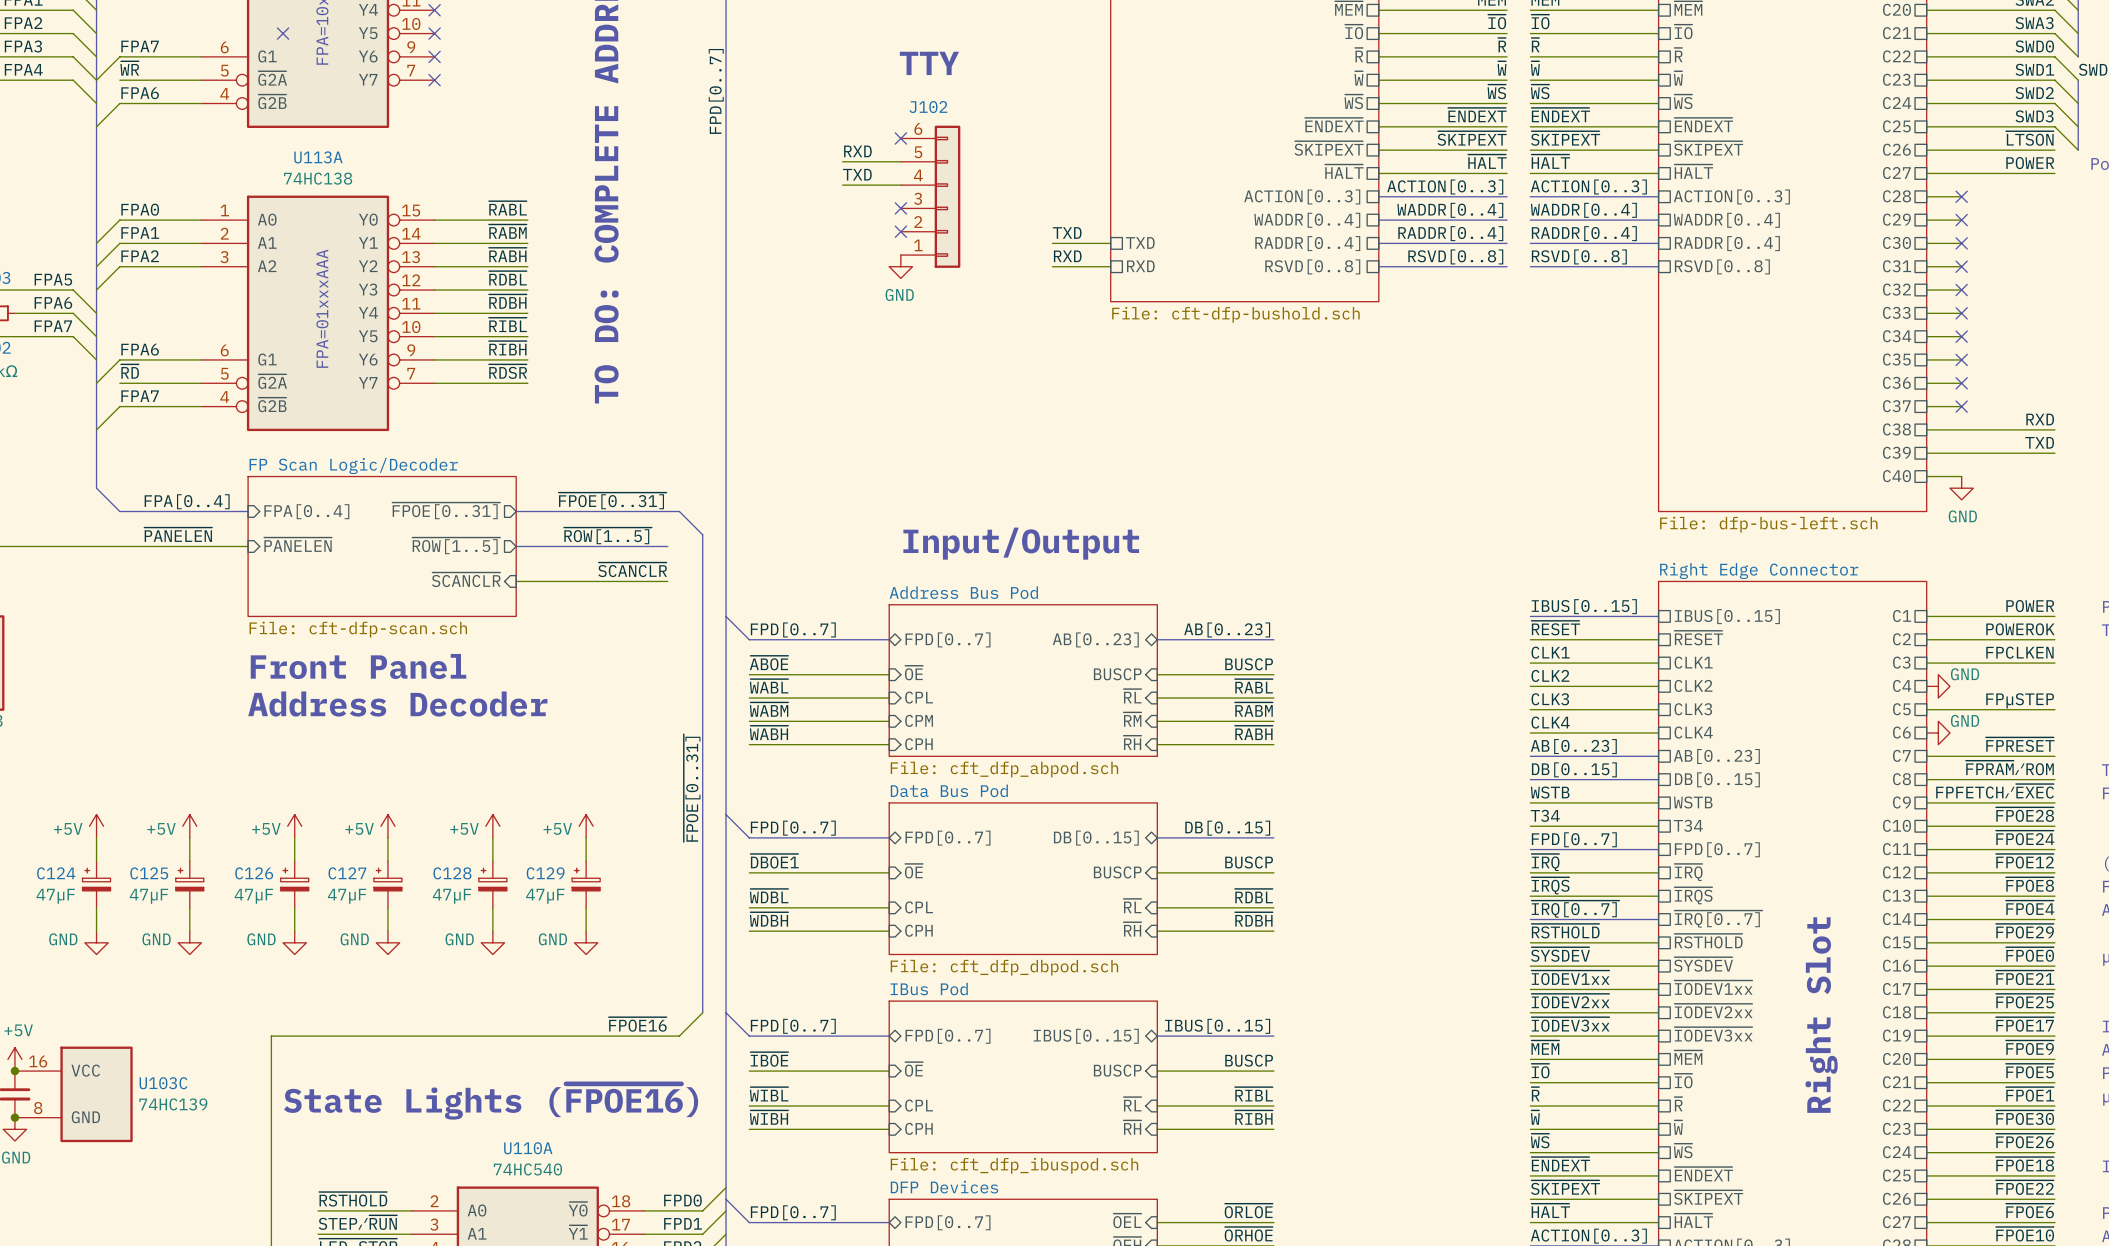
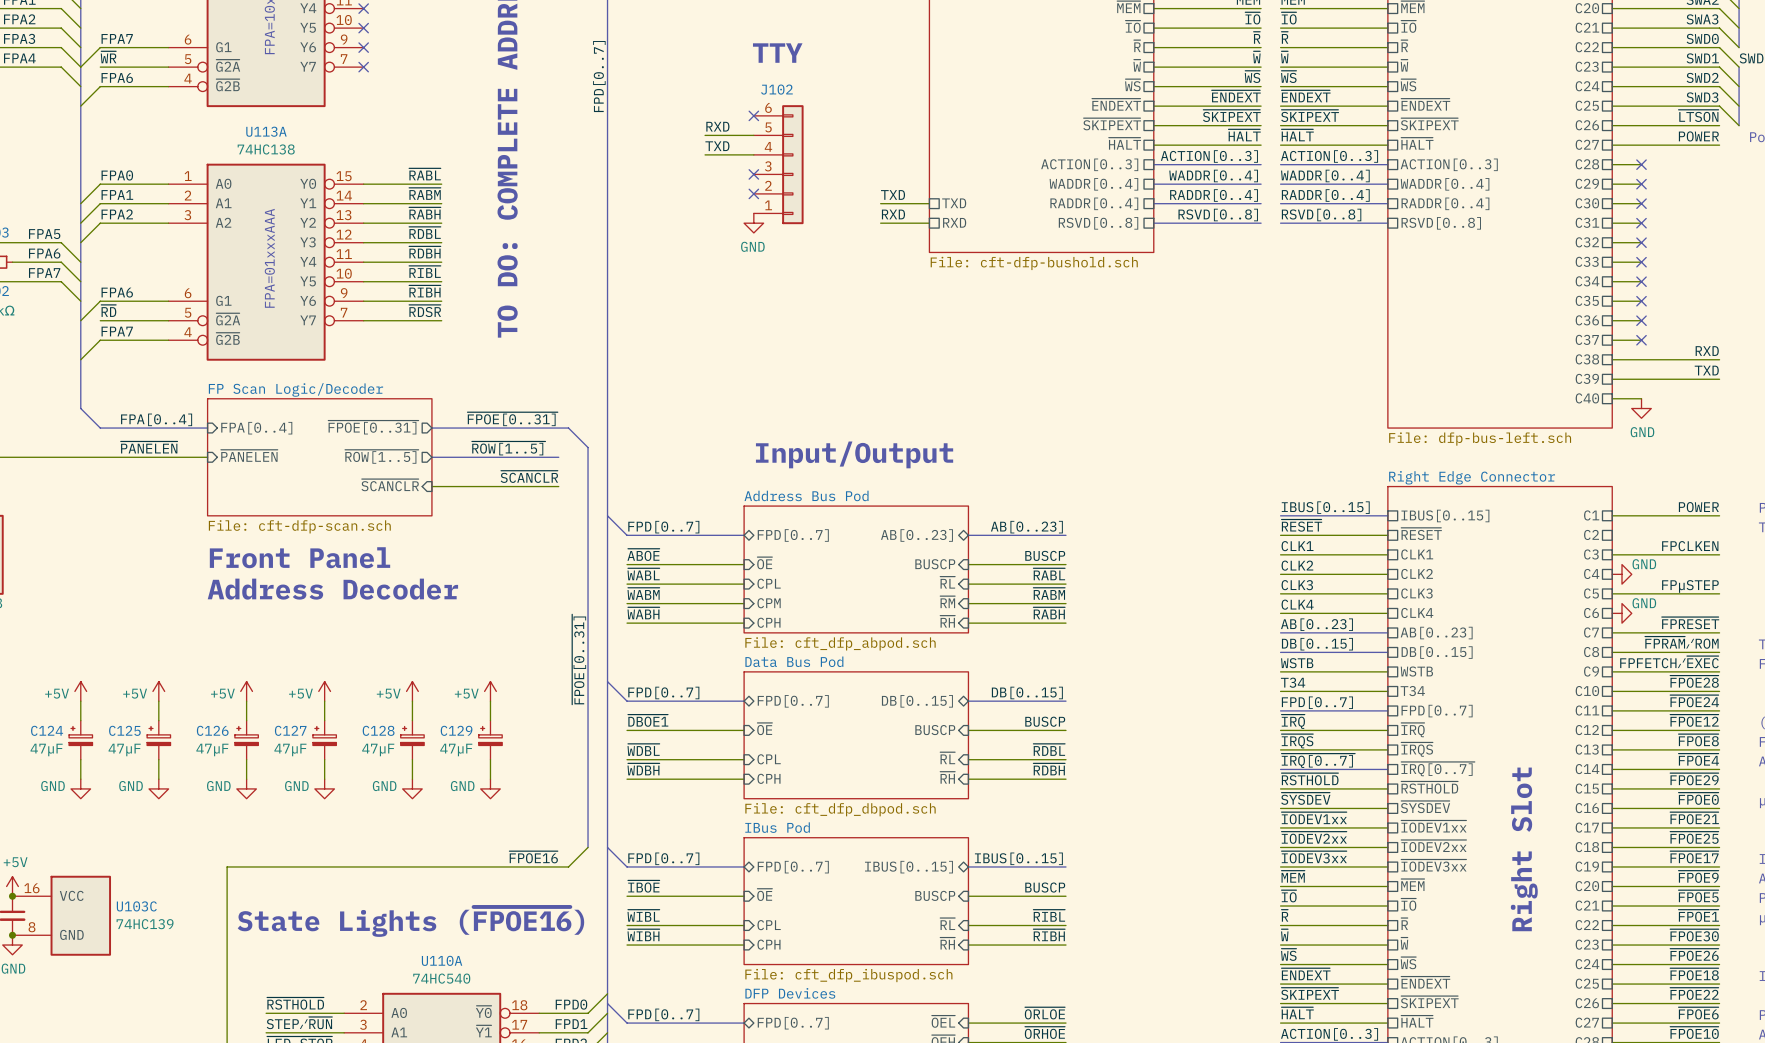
no-connect mark: (283, 33) -> none
label: POWEROK (2020, 629) -> none
wire: (1926, 639) (2054, 639) -> none

